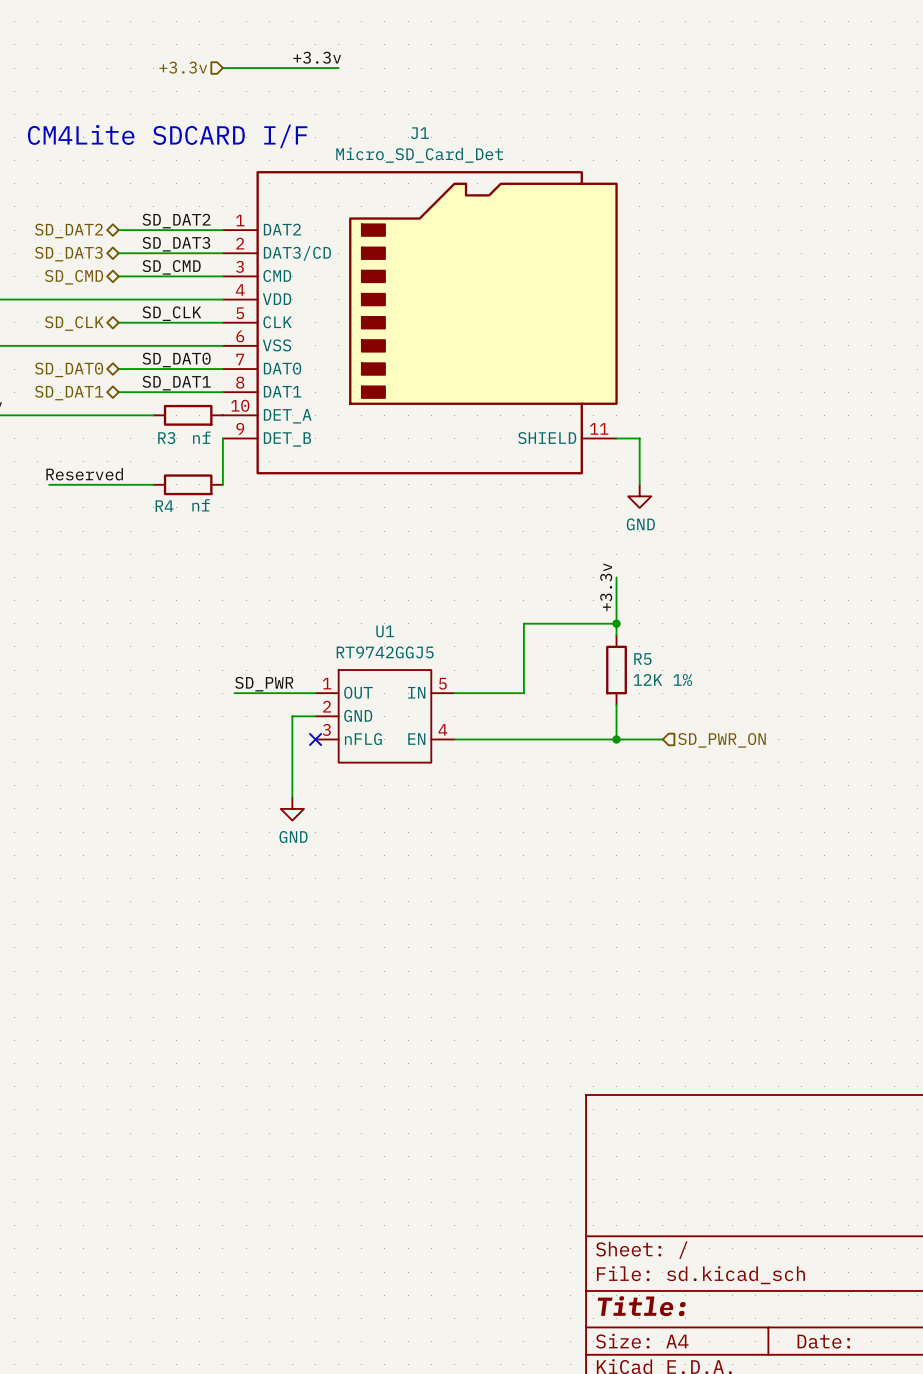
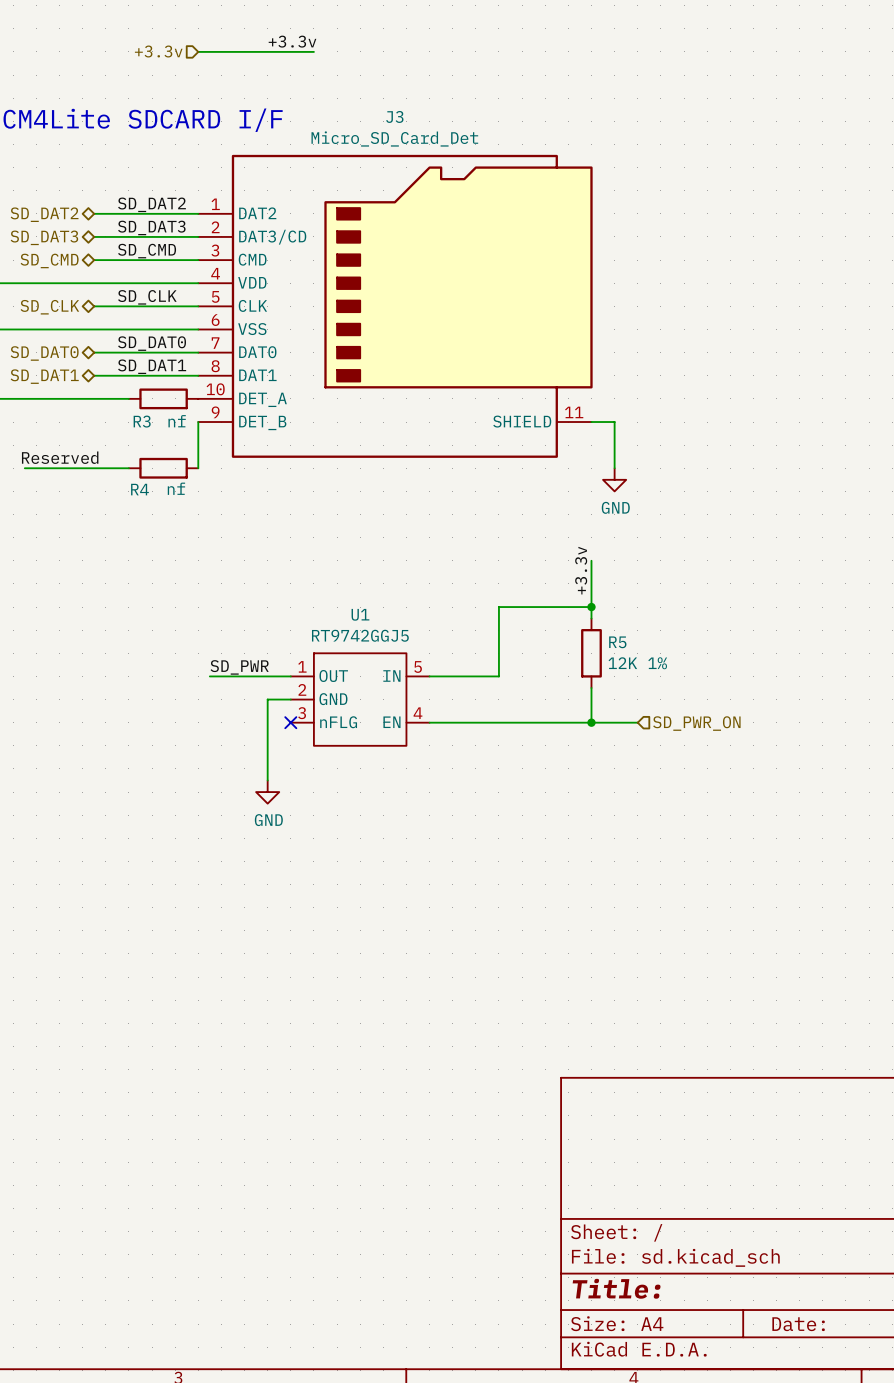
J1 name: J1 (419, 133) -> J3 (394, 116)

